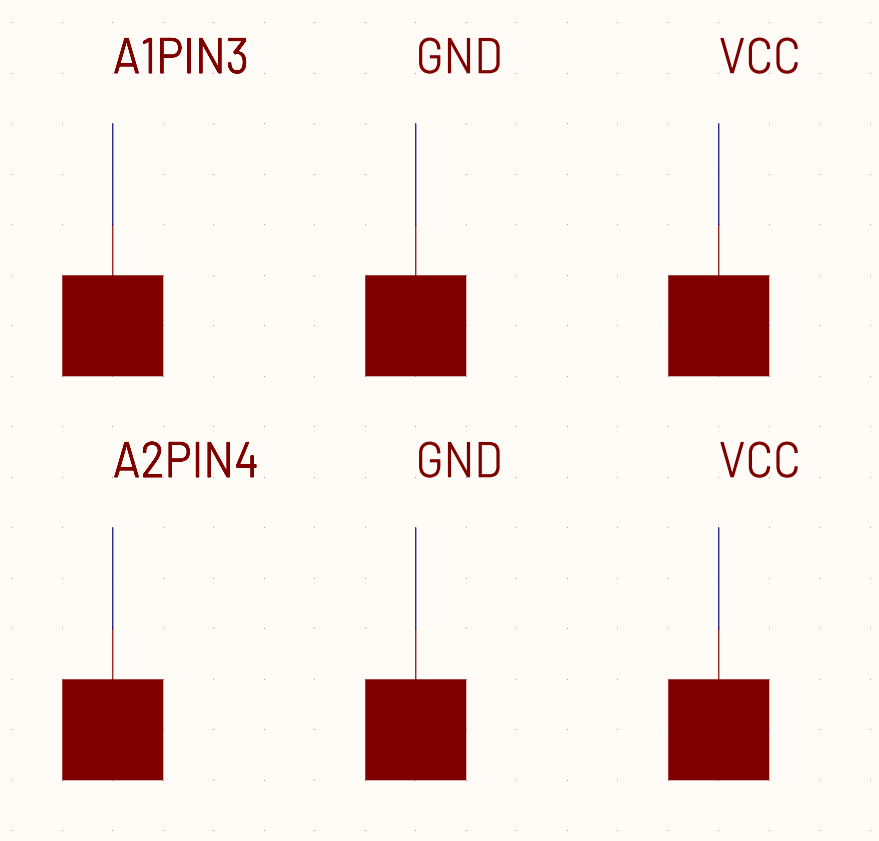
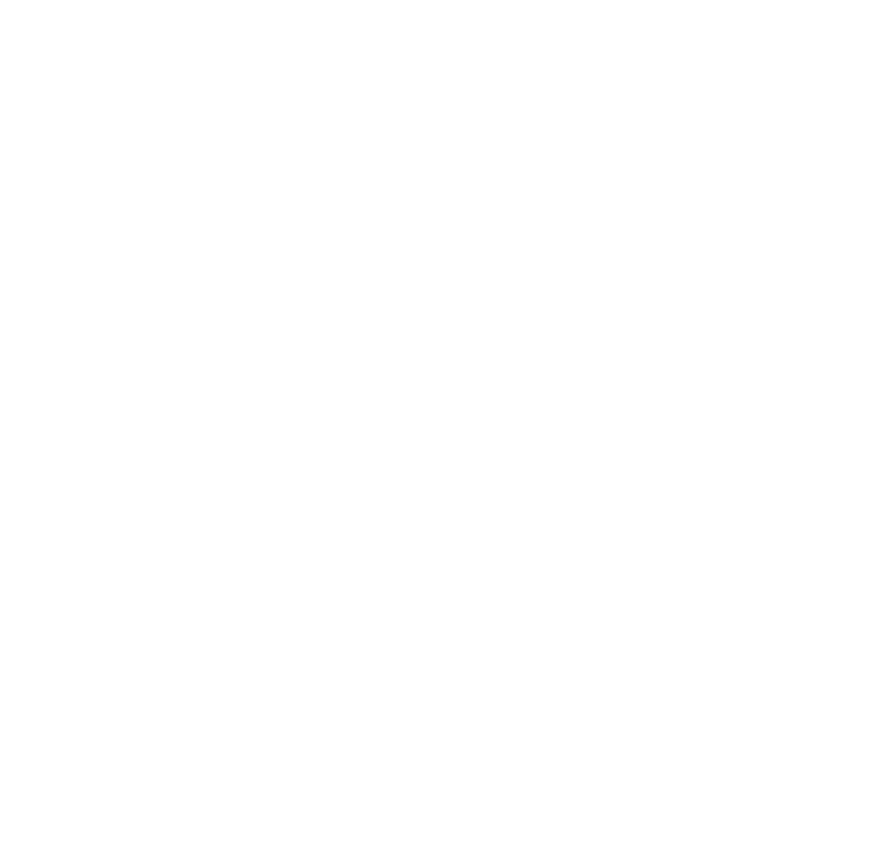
label: A1PIN3 (180, 55) -> none
label: GND (459, 55) -> none
label: VCC (759, 55) -> none
wire: (112, 123) (112, 224) -> none
wire: (415, 123) (415, 224) -> none
wire: (718, 123) (718, 224) -> none
part: (112, 300) -> none
part: (415, 300) -> none
part: (718, 300) -> none
label: A2PIN4 (185, 459) -> none
label: GND (459, 459) -> none
label: VCC (759, 459) -> none
wire: (112, 527) (112, 628) -> none
wire: (415, 527) (415, 628) -> none
wire: (718, 527) (718, 628) -> none
part: (112, 704) -> none
part: (415, 704) -> none
part: (718, 704) -> none

